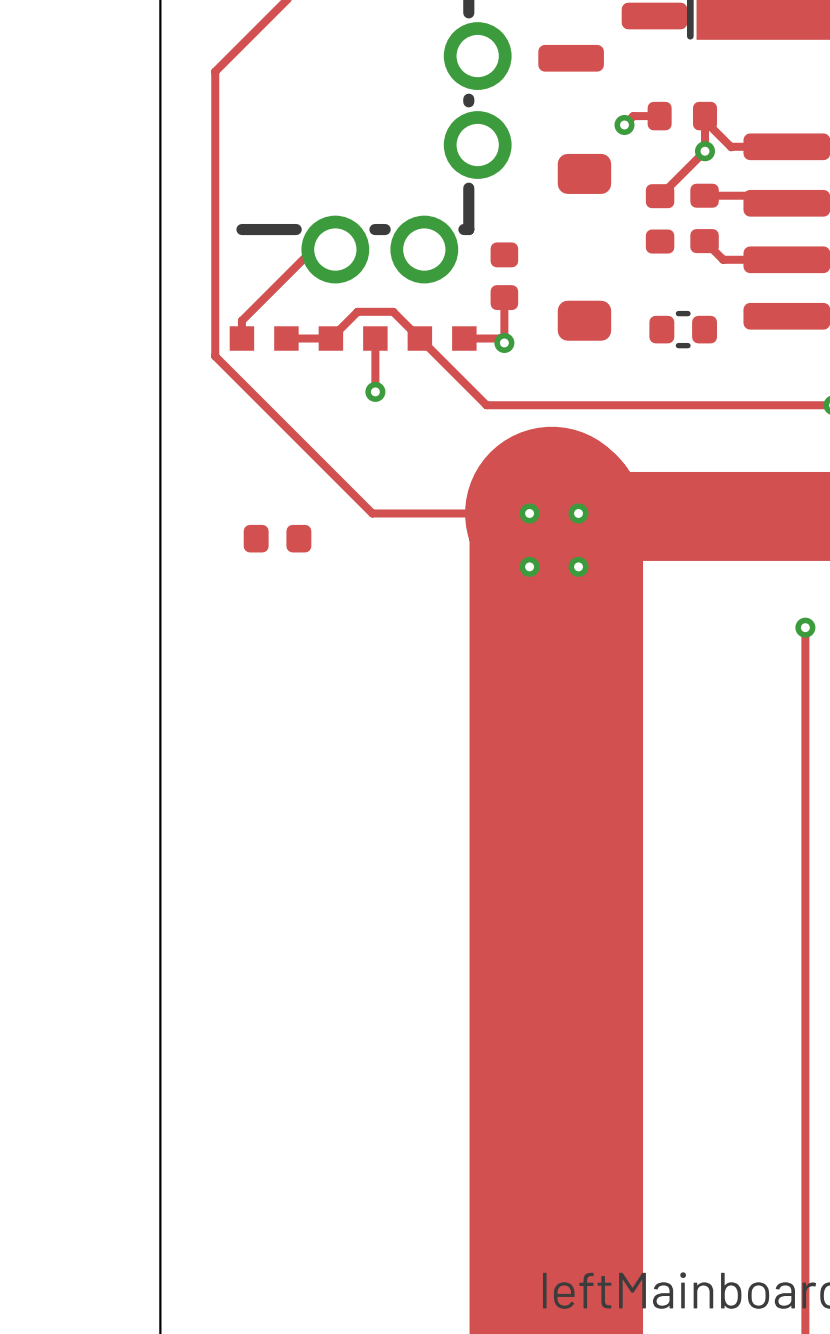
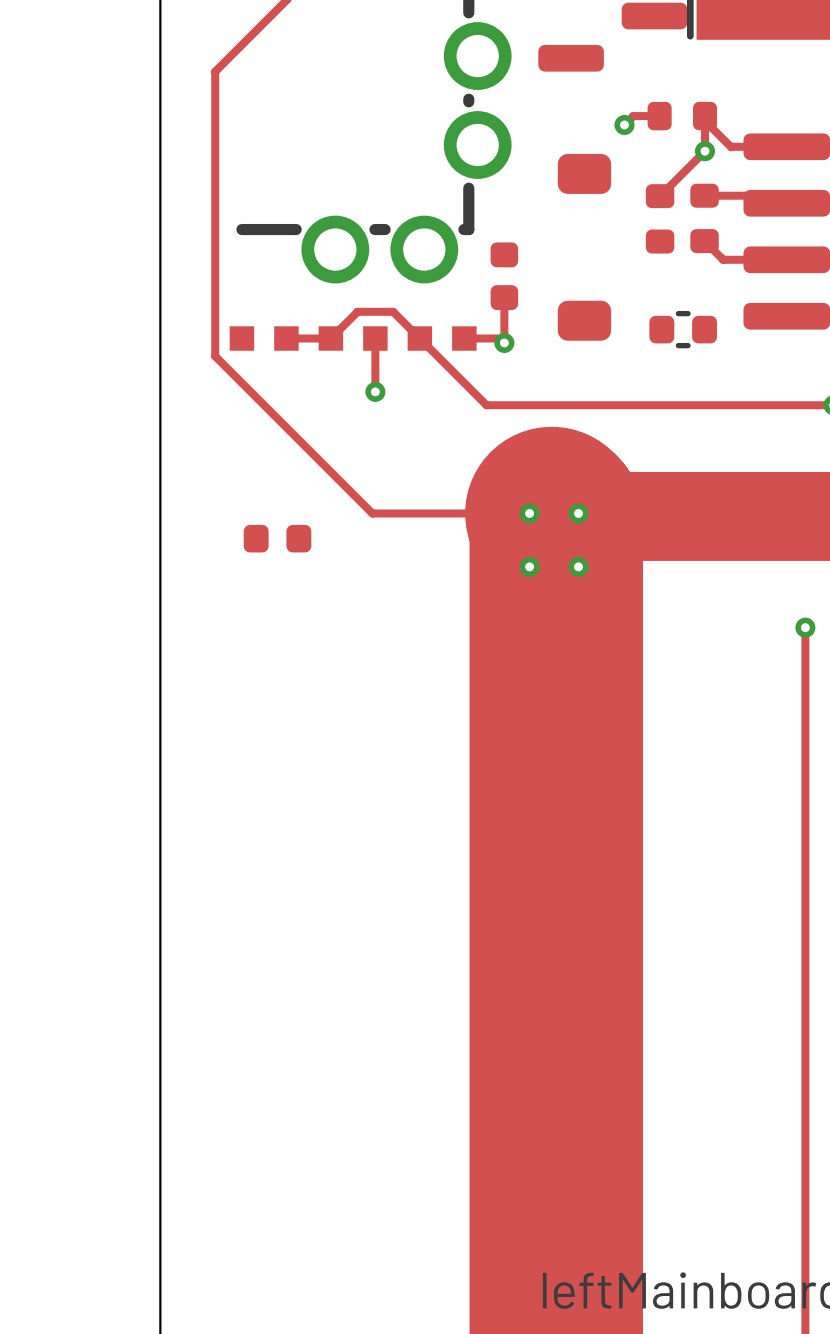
track: (335, 249) (313, 249) (241, 320) (241, 338) -> none

